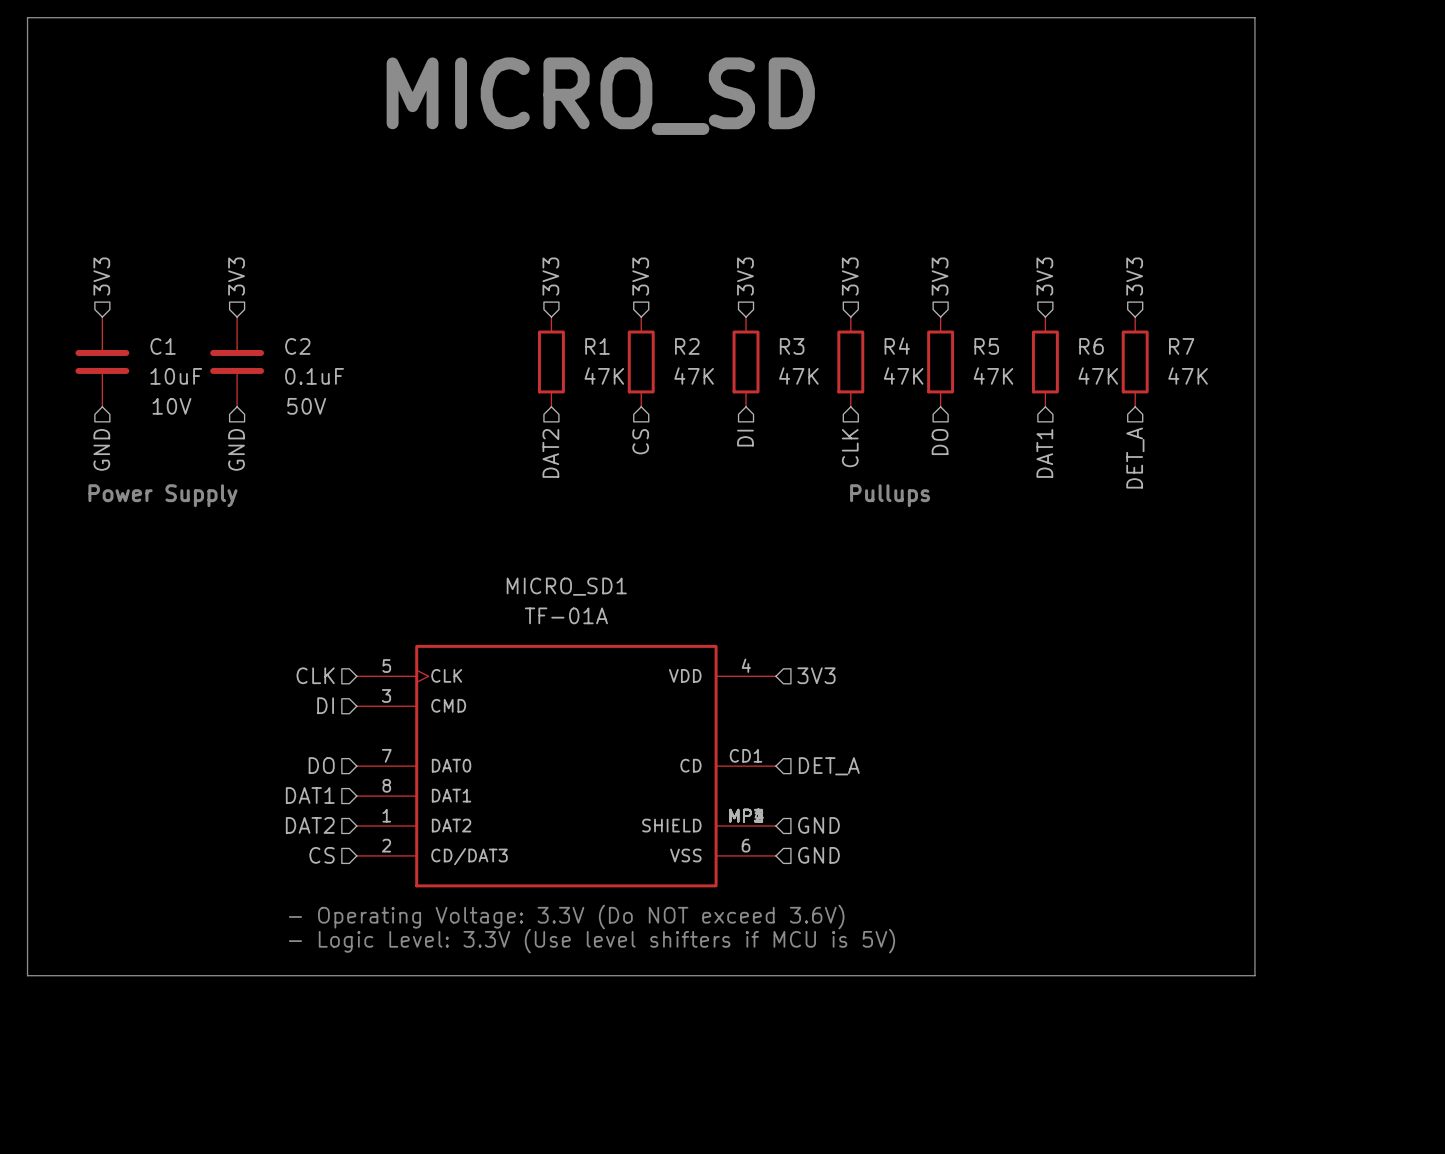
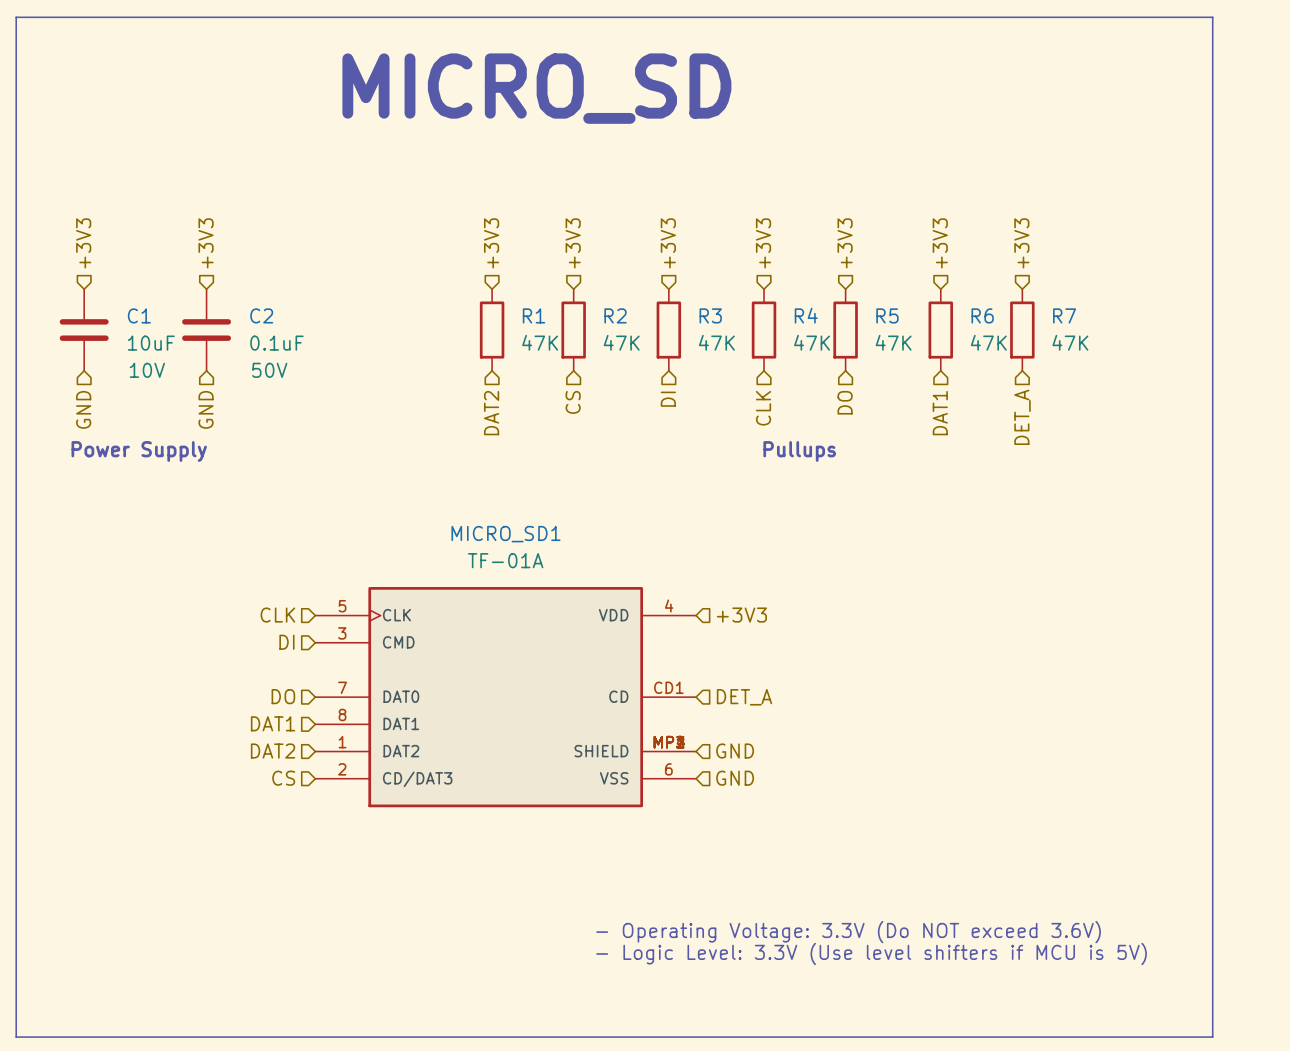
line: (1254, 17) (1254, 975) (27, 975) -> (1131, 17) (1212, 17) (1212, 1037) (16, 1037) (16, 887)
hierarchical label: 3V3 (101, 276) -> +3V3 (83, 243)
hierarchical label: 3V3 (236, 276) -> +3V3 (206, 243)
hierarchical label: 3V3 (550, 276) -> +3V3 (491, 243)
hierarchical label: 3V3 (640, 276) -> +3V3 (573, 243)
hierarchical label: 3V3 (745, 276) -> +3V3 (668, 243)
hierarchical label: 3V3 (850, 276) -> +3V3 (763, 243)
hierarchical label: 3V3 (940, 276) -> +3V3 (845, 243)
hierarchical label: 3V3 (1044, 276) -> +3V3 (940, 243)
hierarchical label: 3V3 (1134, 276) -> +3V3 (1021, 243)
hierarchical label: 3V3 (816, 675) -> +3V3 (741, 615)
text: - Operating Voltage: 3.3V (Do NOT exceed 3.6V) (566, 917) -> none
text: - Logic Level: 3.3V (Use level shifters if MCU is 5V) (591, 941) -> none
text: none -> - Operating Voltage: 3.3V (Do NOT exceed 3.6V) (848, 932)
text: none -> - Logic Level: 3.3V (Use level shifters if MCU is 5V) (871, 953)

